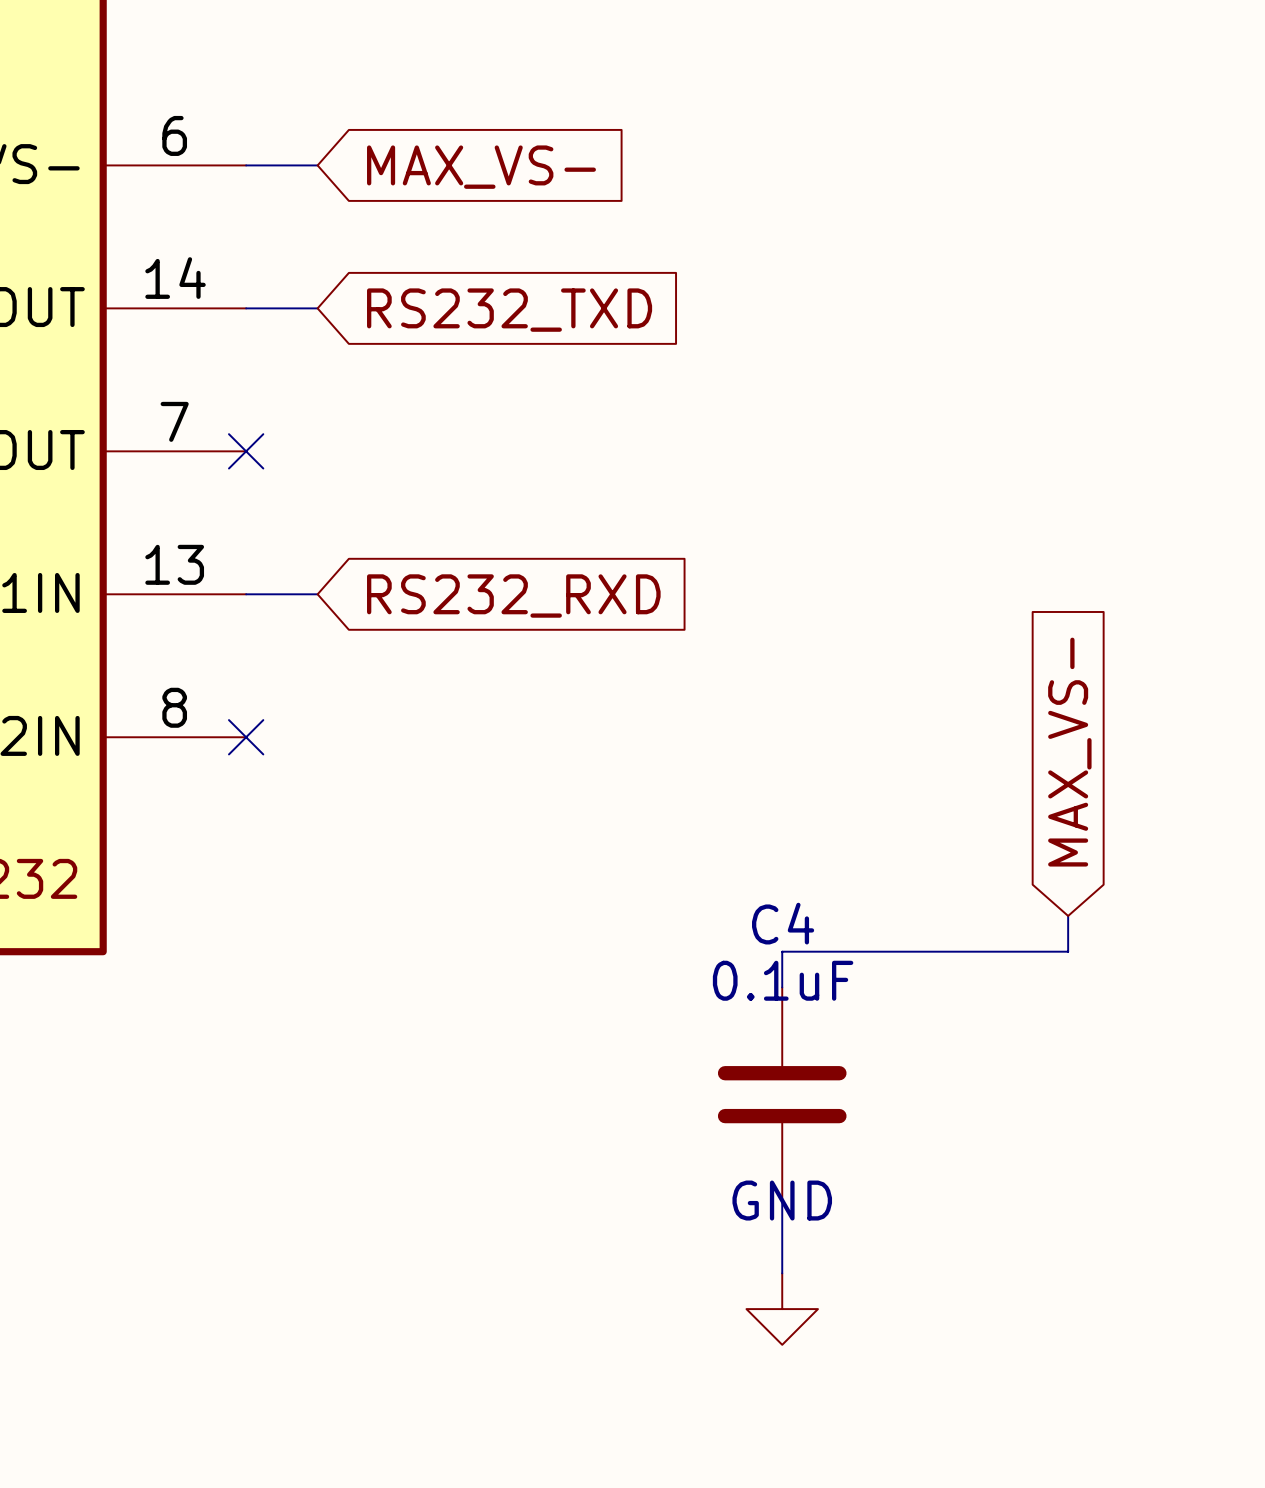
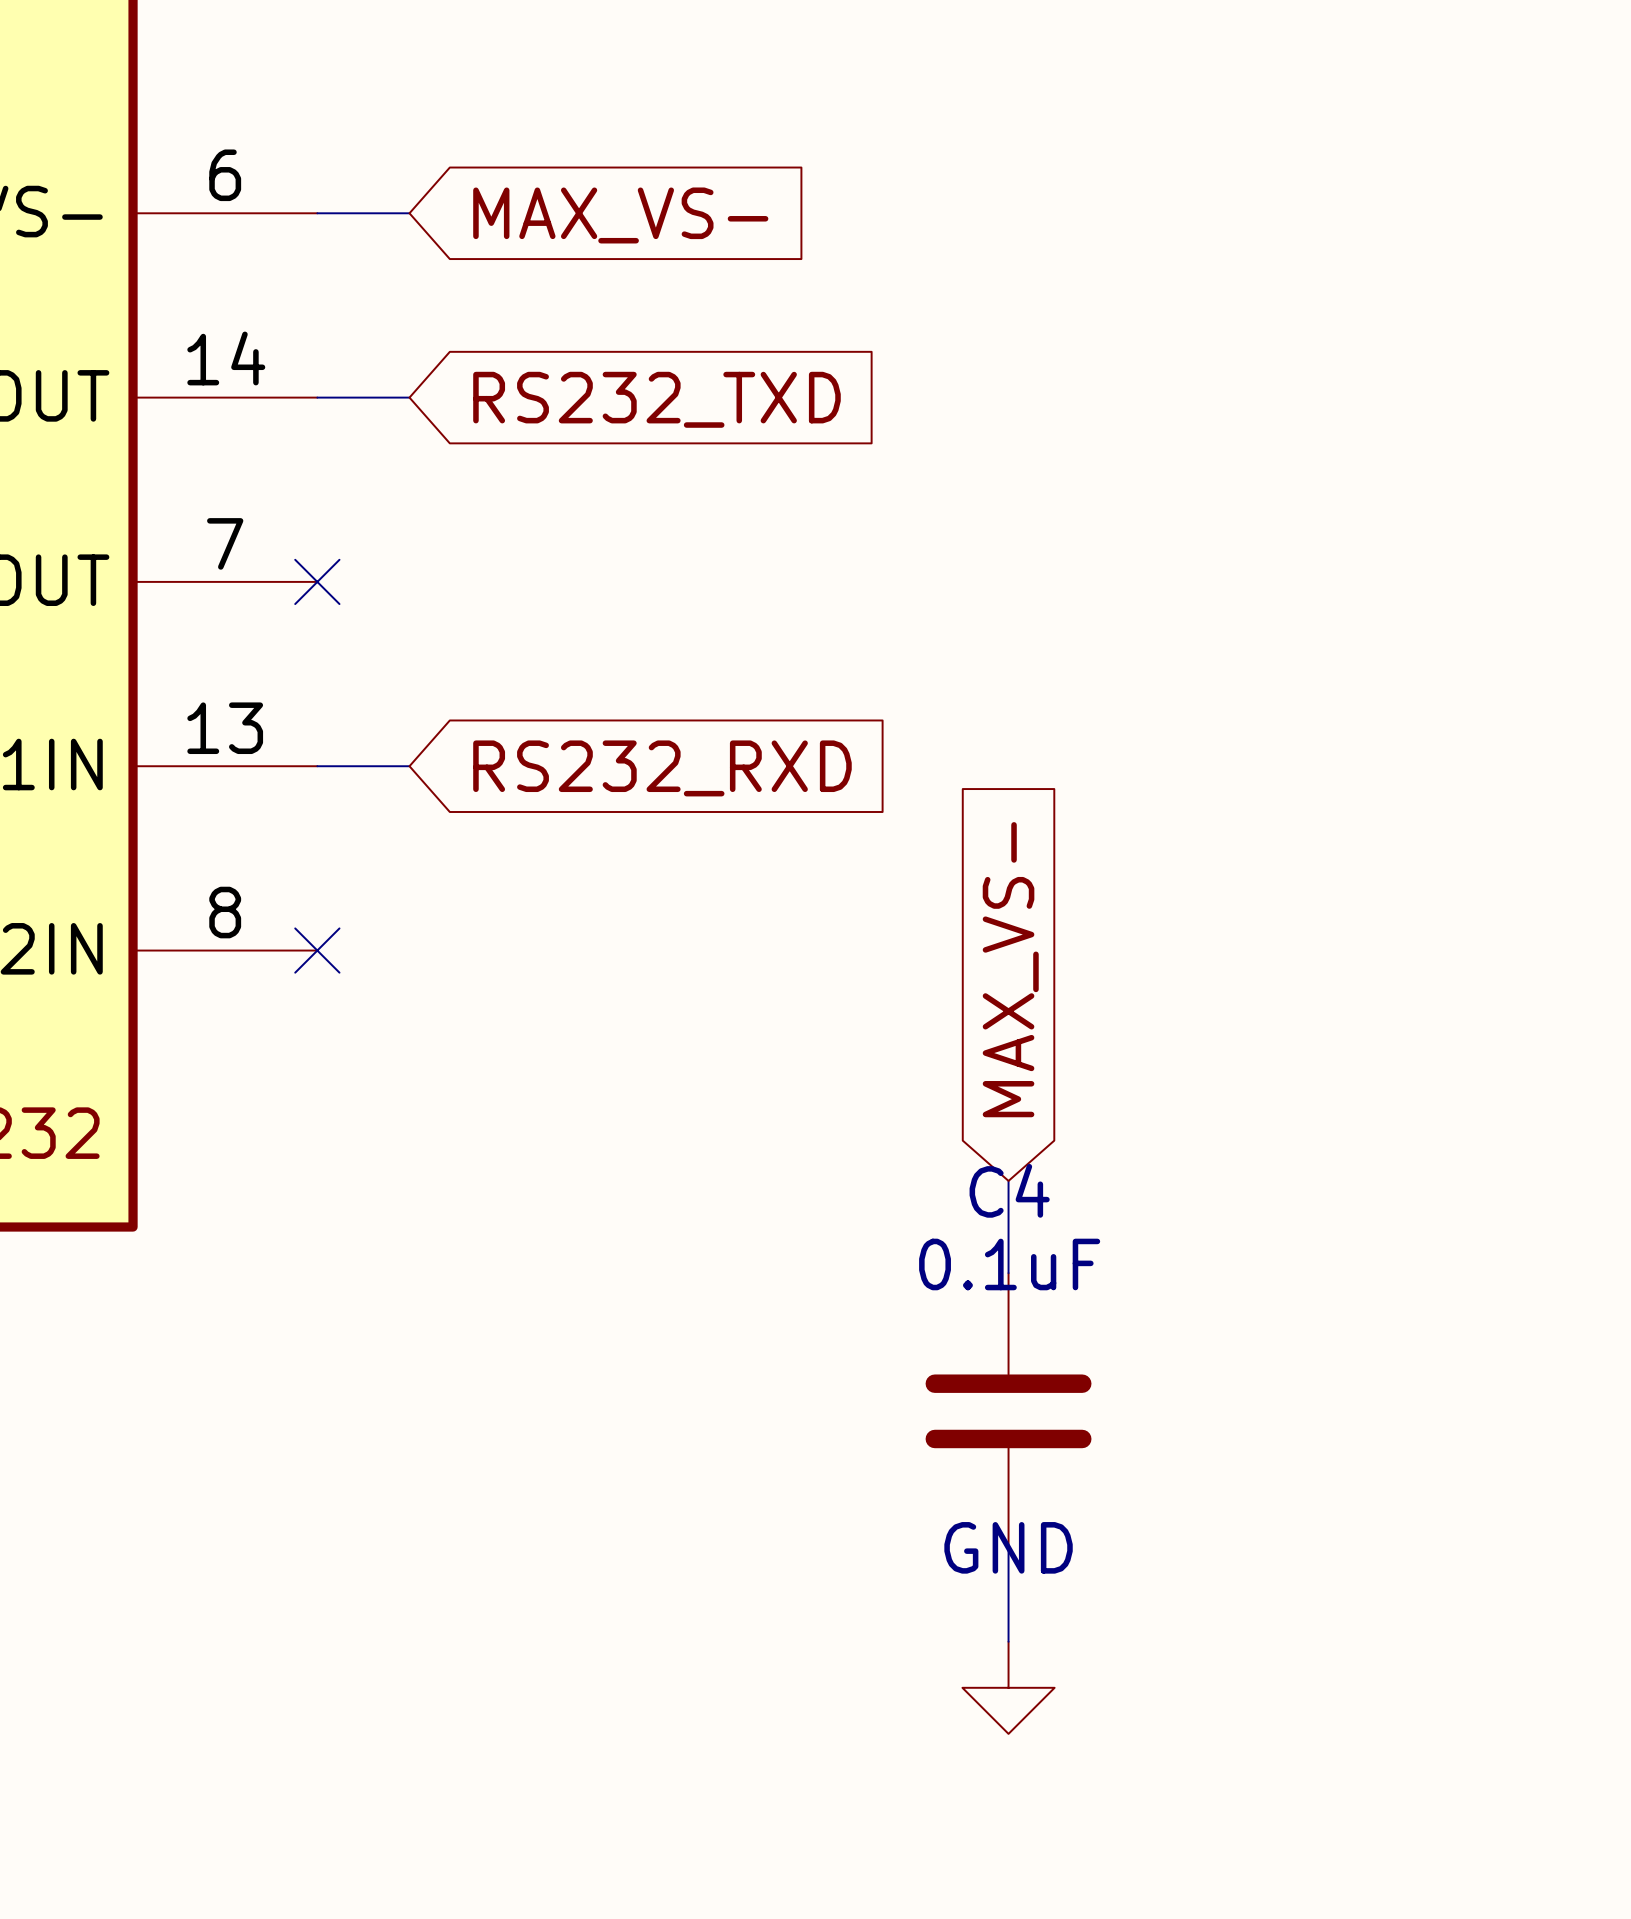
global label position: MAX_VS- (1069, 752) -> MAX_VS- (1010, 969)
wire: (1068, 915) (1068, 951) (782, 951) -> (1008, 1180) (1008, 1227)

